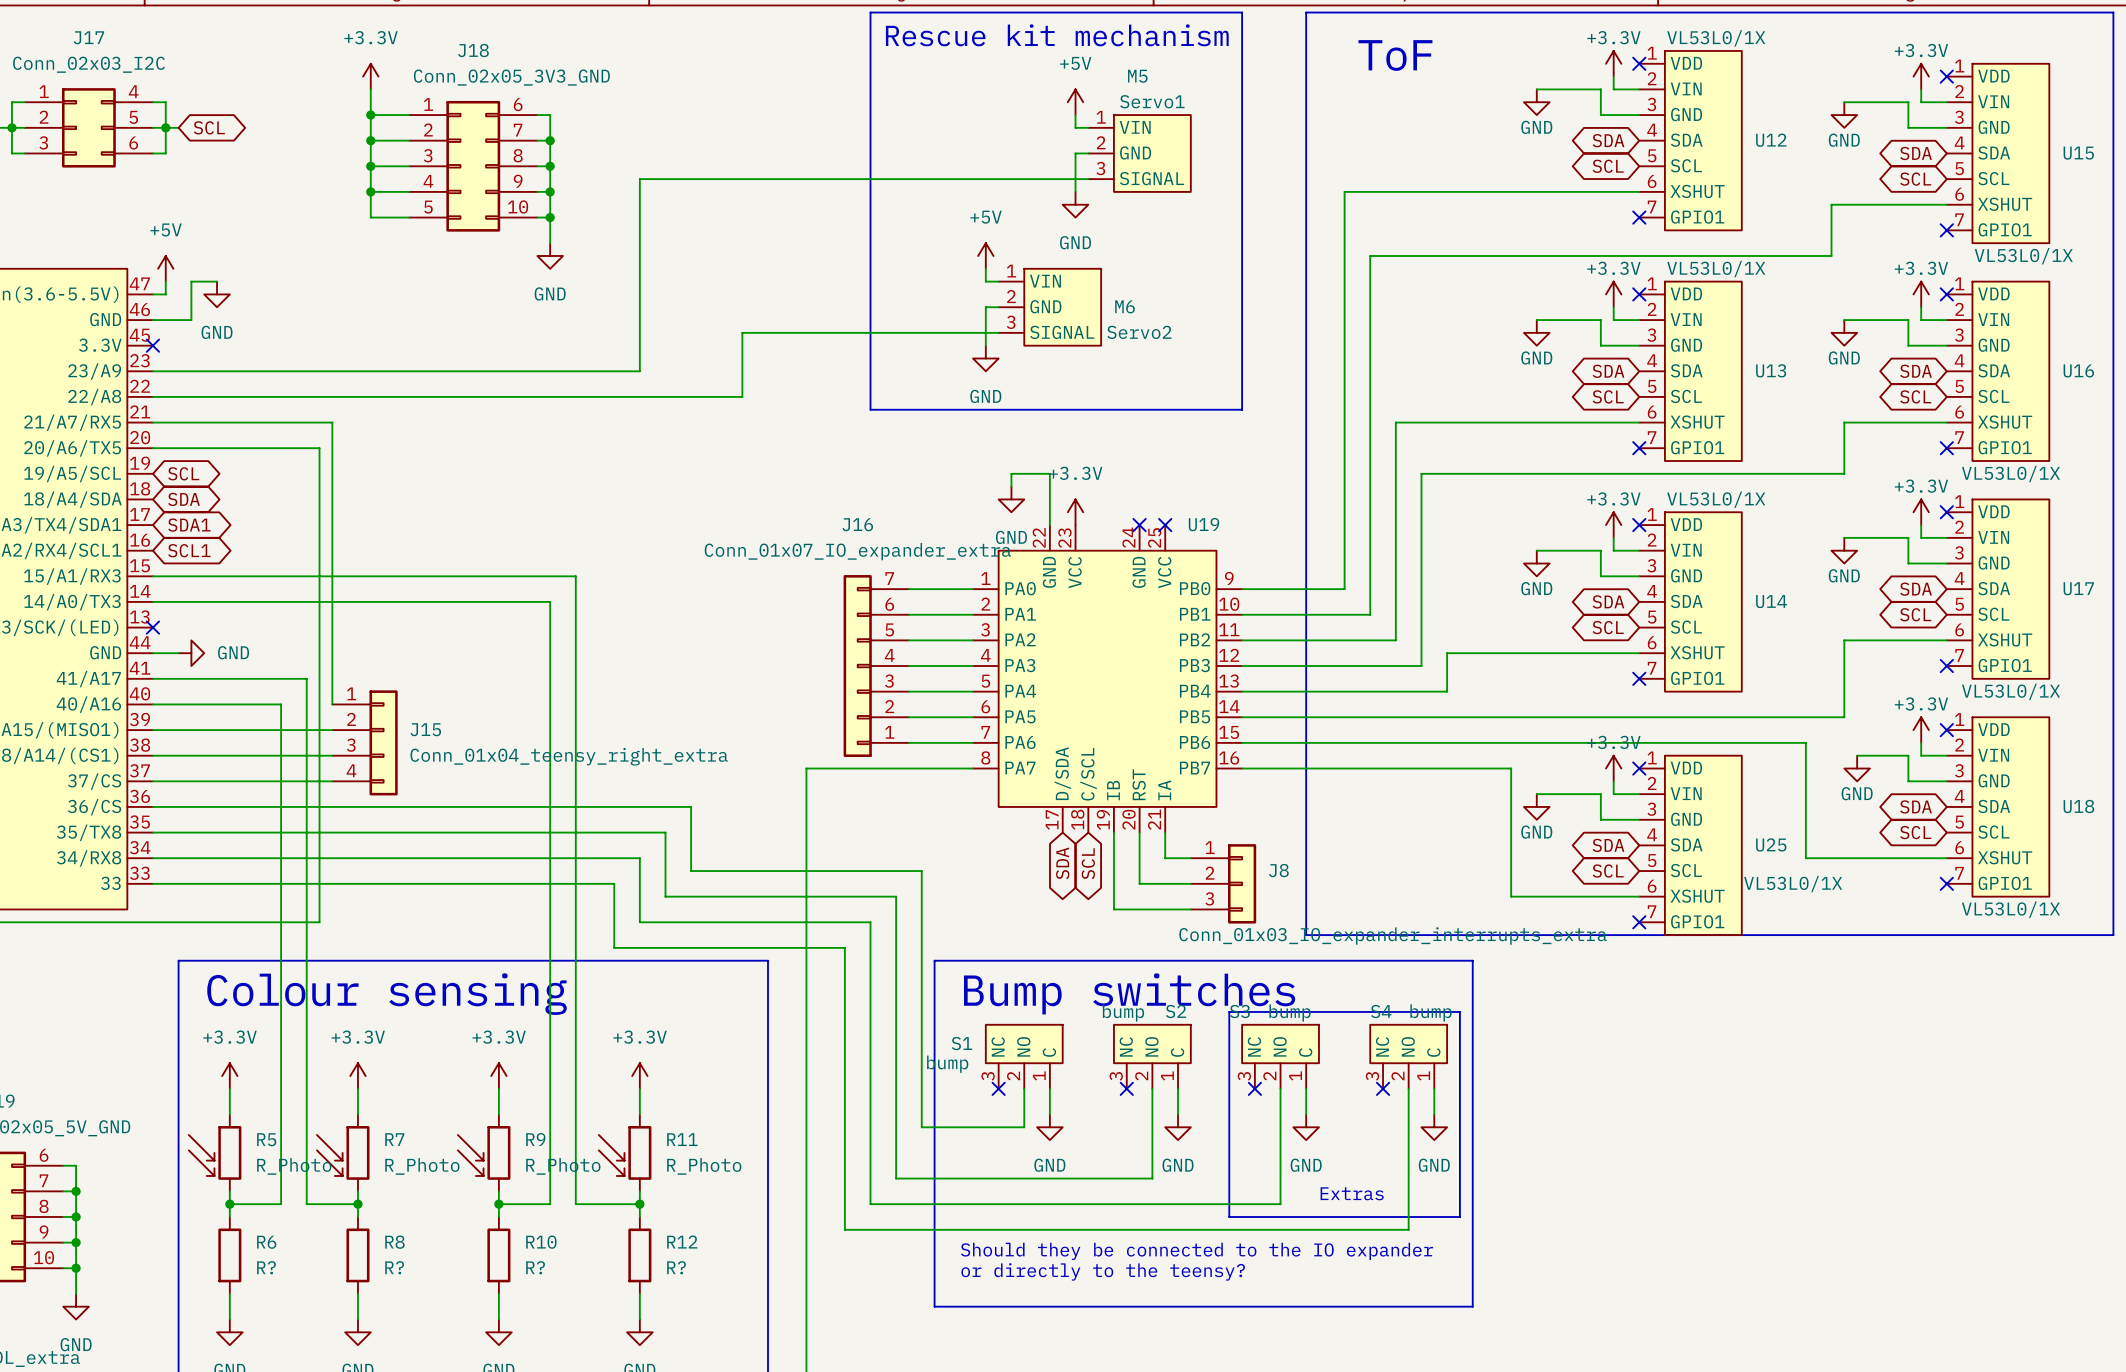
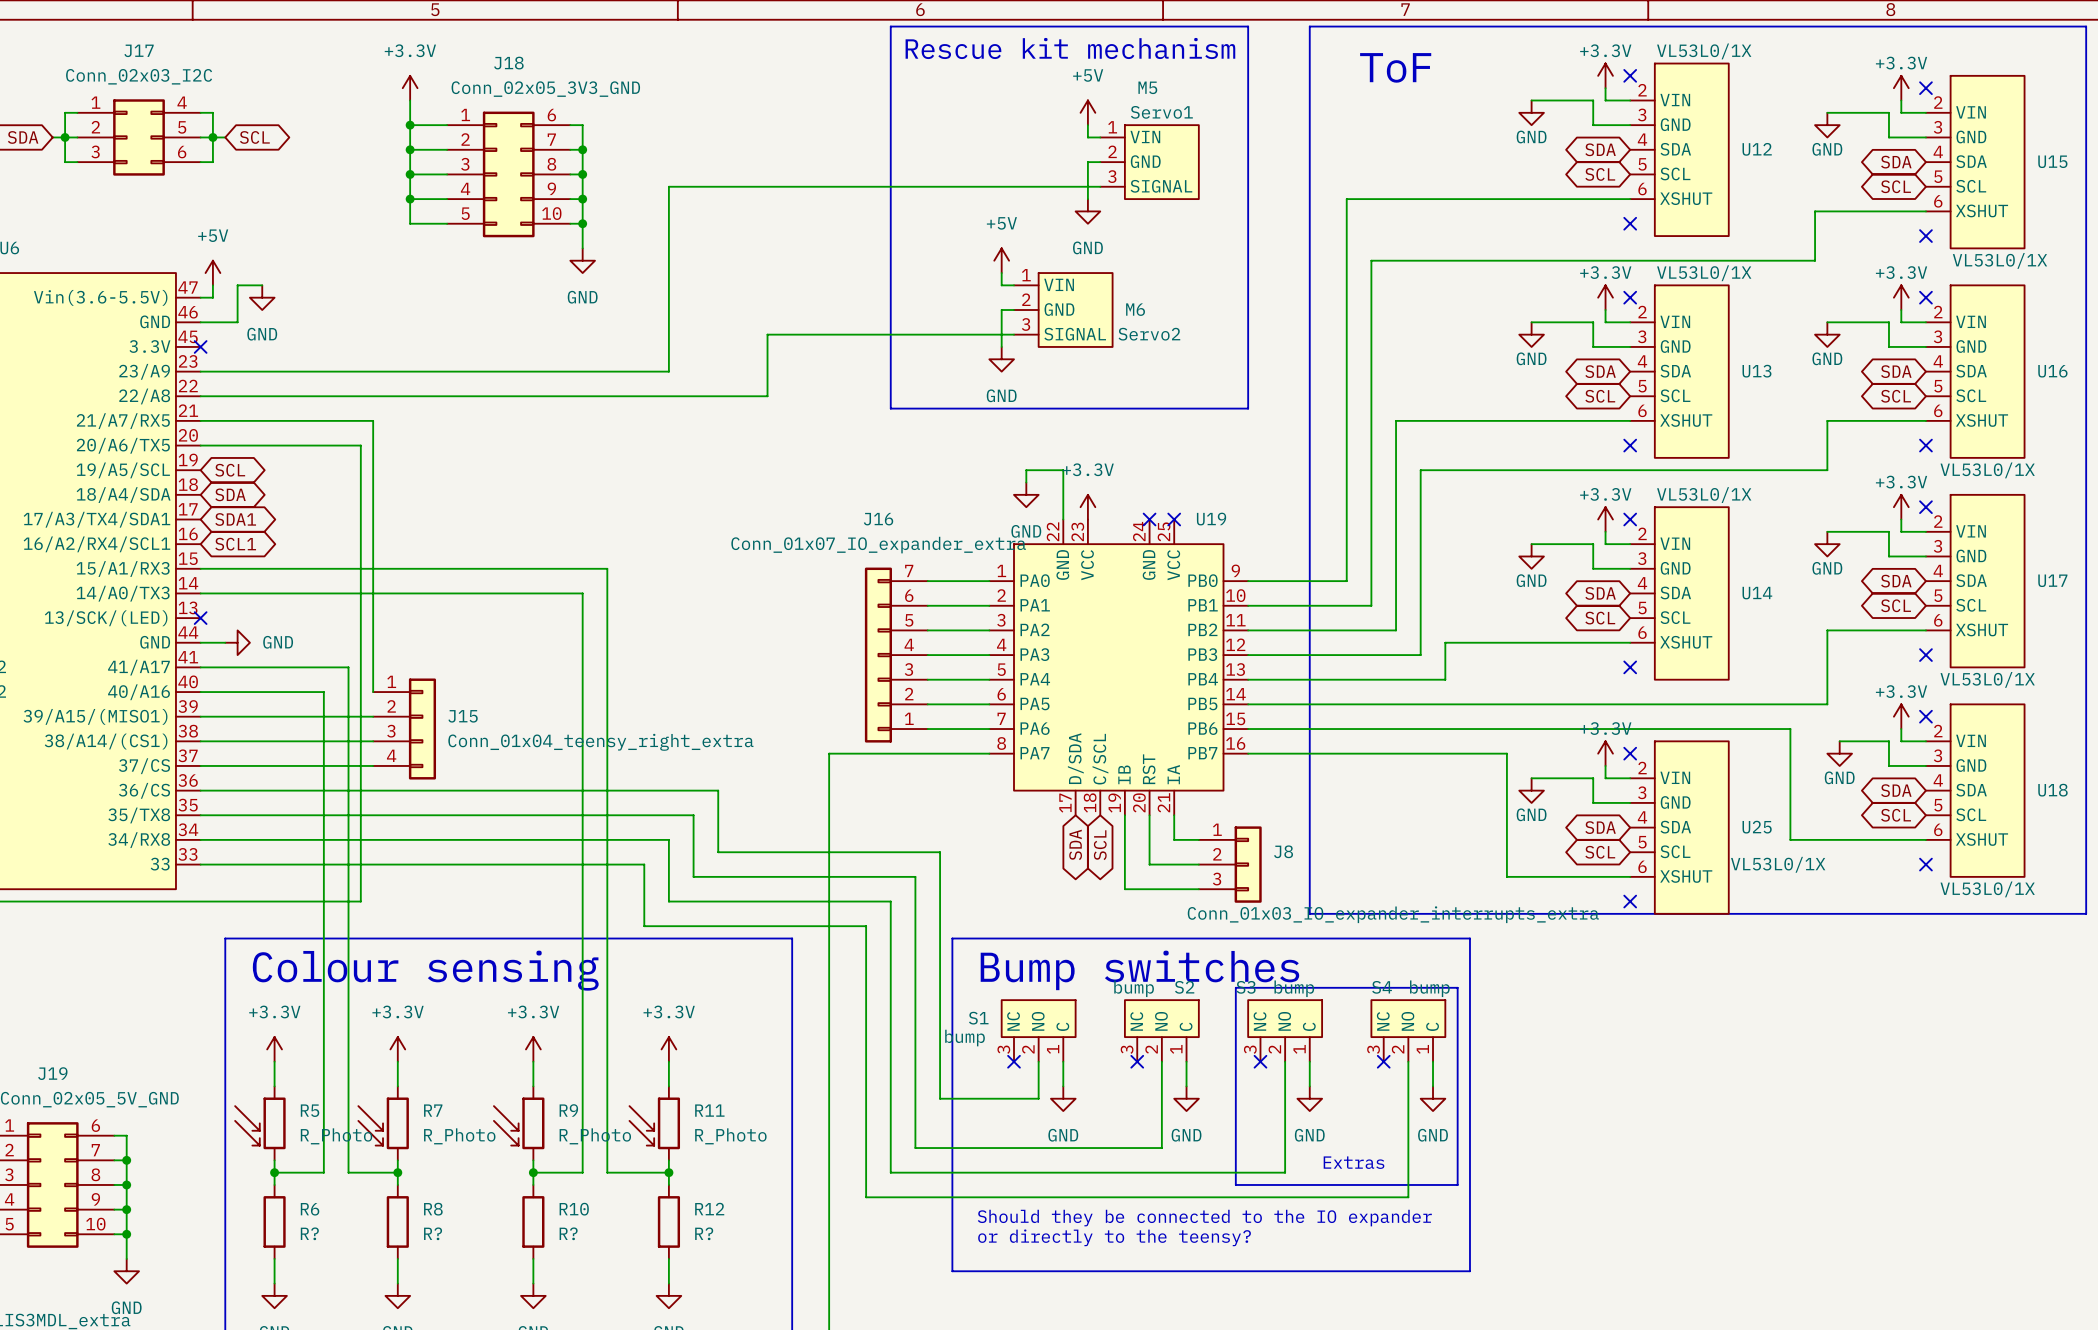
U12 symbol: [1639, 50, 1742, 231] -> [1630, 63, 1729, 237]
U15 symbol: [1946, 63, 2050, 244] -> [1925, 75, 2025, 249]
U13 symbol: [1639, 281, 1742, 462] -> [1630, 285, 1729, 458]
U16 symbol: [1946, 281, 2050, 462] -> [1925, 285, 2025, 458]
U17 symbol: [1946, 499, 2050, 679] -> [1925, 494, 2025, 668]
U14 symbol: [1639, 512, 1742, 692] -> [1630, 507, 1729, 680]
U18 symbol: [1946, 717, 2050, 897] -> [1925, 704, 2025, 877]
U25 symbol: [1639, 755, 1742, 936] -> [1630, 741, 1729, 914]

